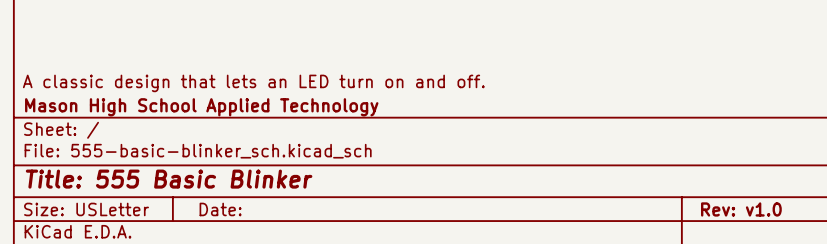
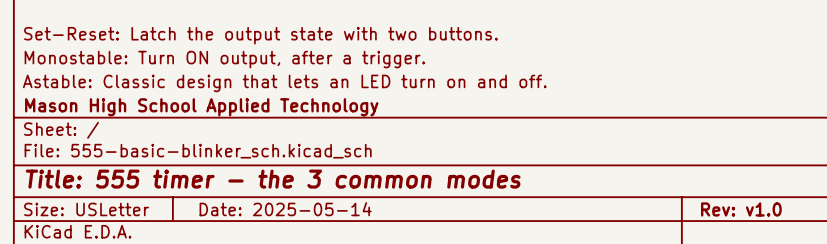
title block: none -> Set-Reset: Latch the output state with two buttons. (260, 35)
title block: none -> Monostable: Turn ON output, after a trigger. (224, 59)
title block: A classic design that lets an LED turn on and off. (253, 83) -> Astable: Classic design that lets an LED turn on and off. (284, 83)
title block: Title: 555 Basic Blinker (169, 179) -> Title: 555 timer - the 3 common modes (273, 179)
title block: Date: (220, 209) -> Date: 2025-05-14 (285, 209)

